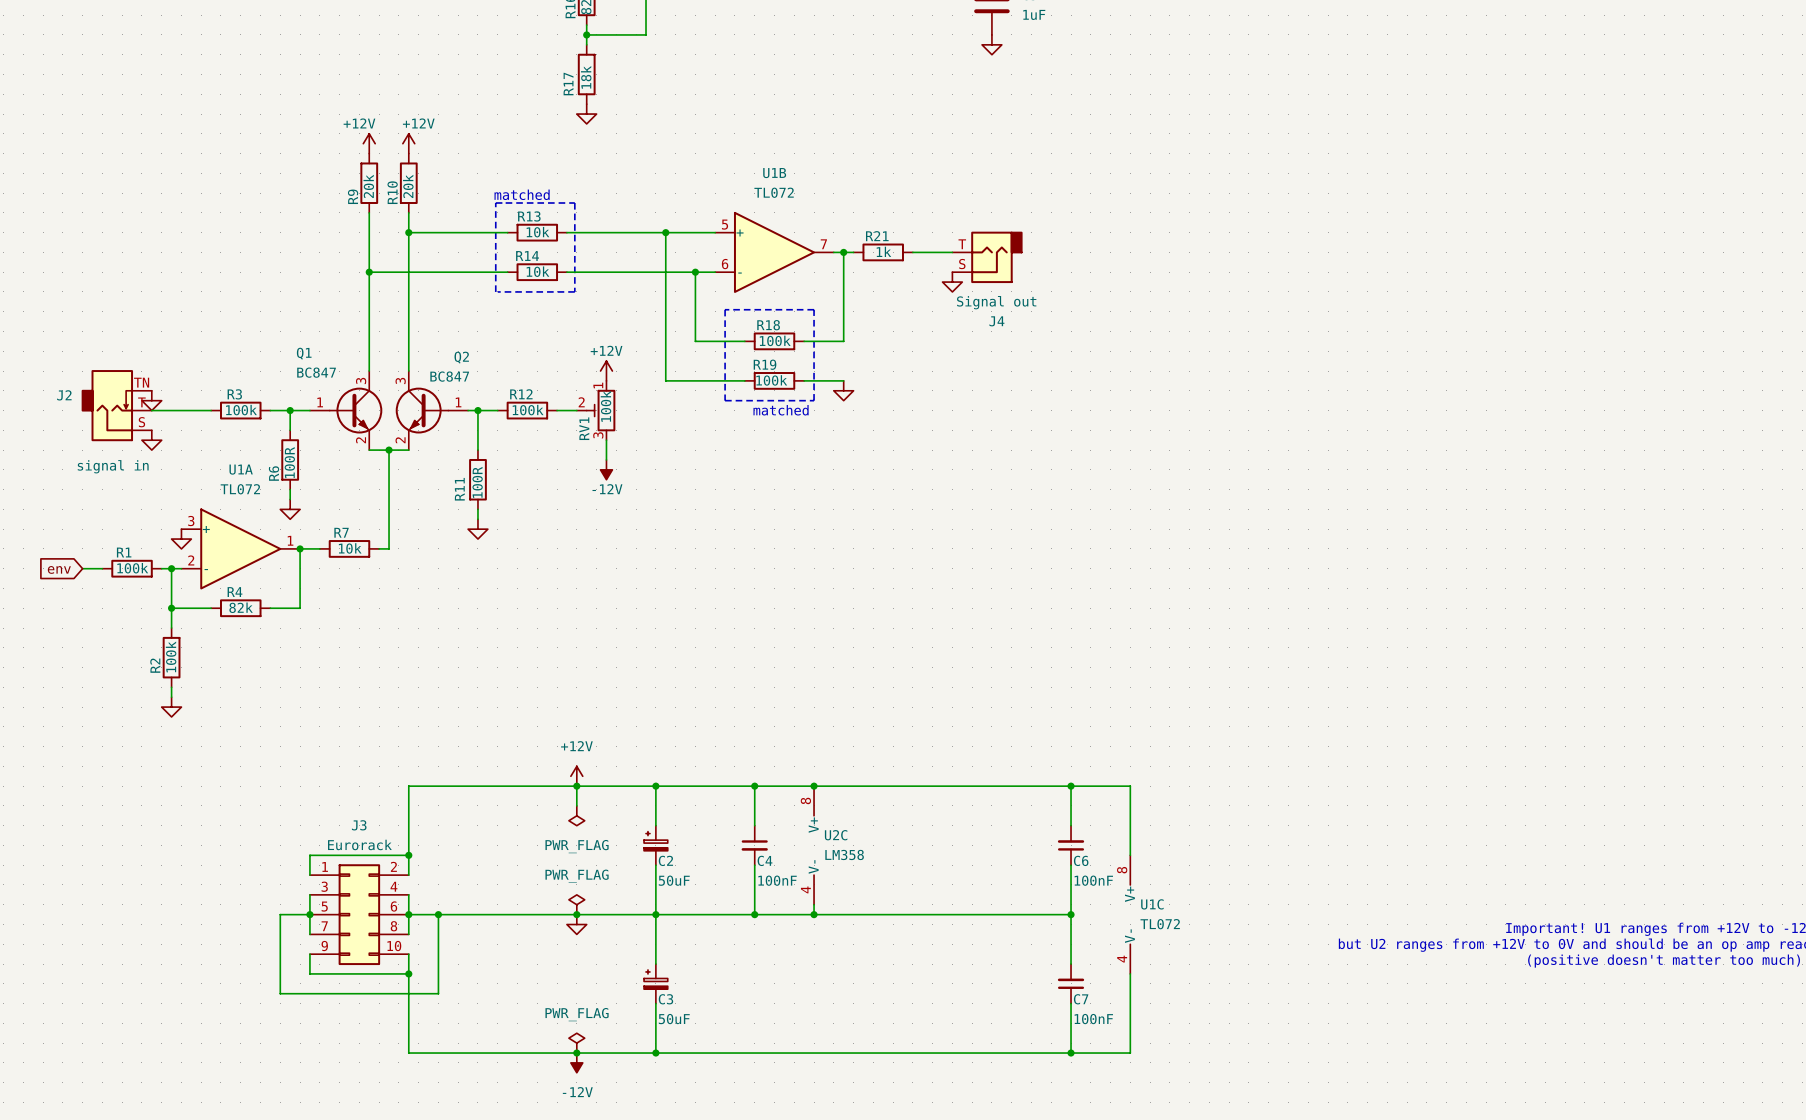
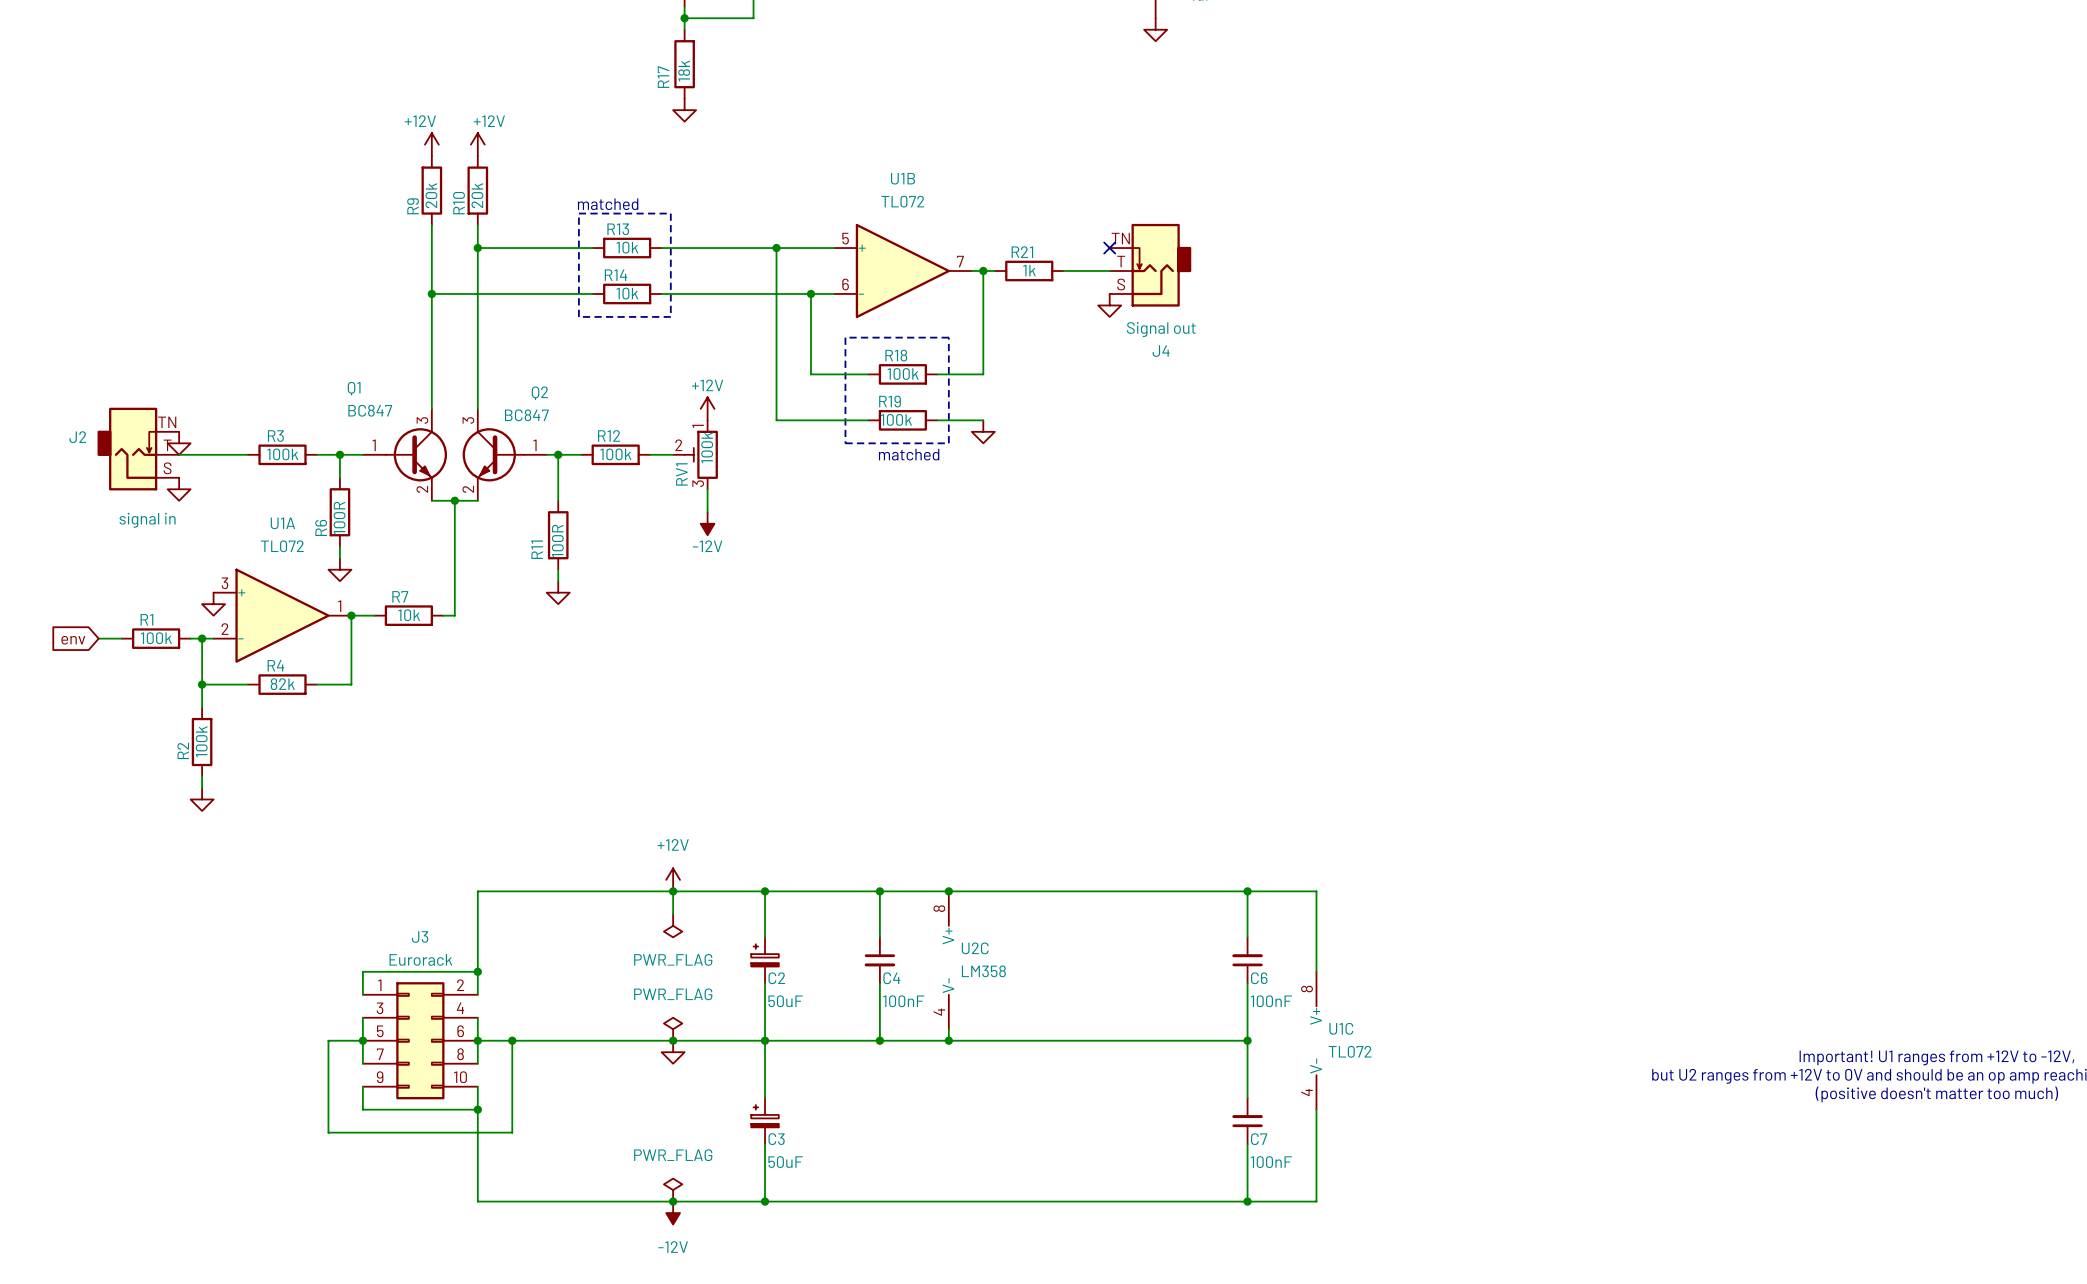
J4 symbol: [952, 231, 1023, 284] -> [1109, 223, 1192, 307]
no-connect mark: none -> (1109, 248)

